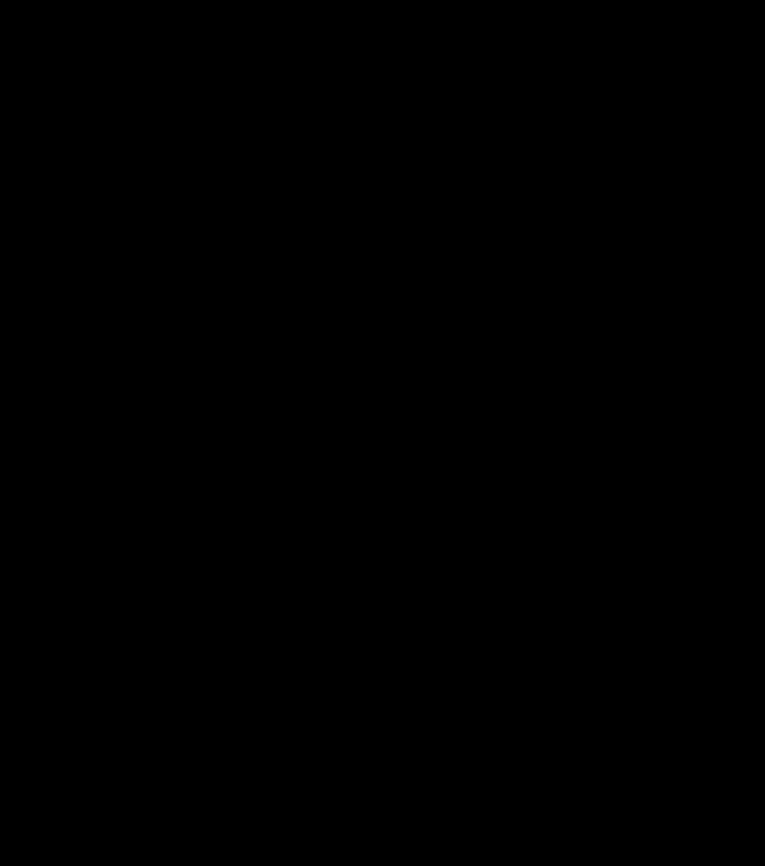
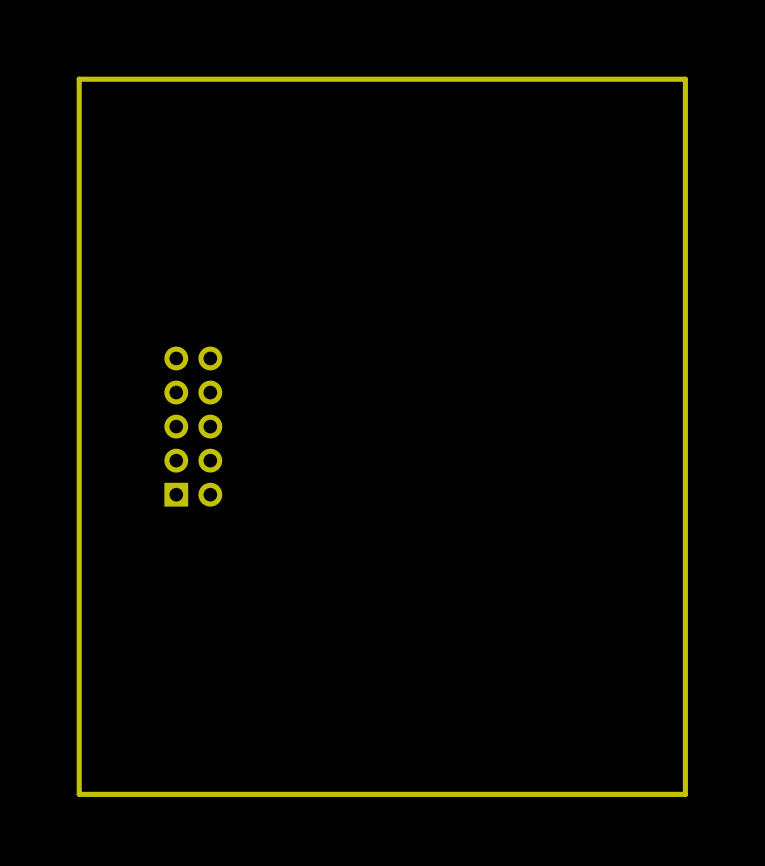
board edge: none -> (685, 79) (685, 794) (79, 794) (79, 79) (685, 79)
part: none -> (193, 426)

